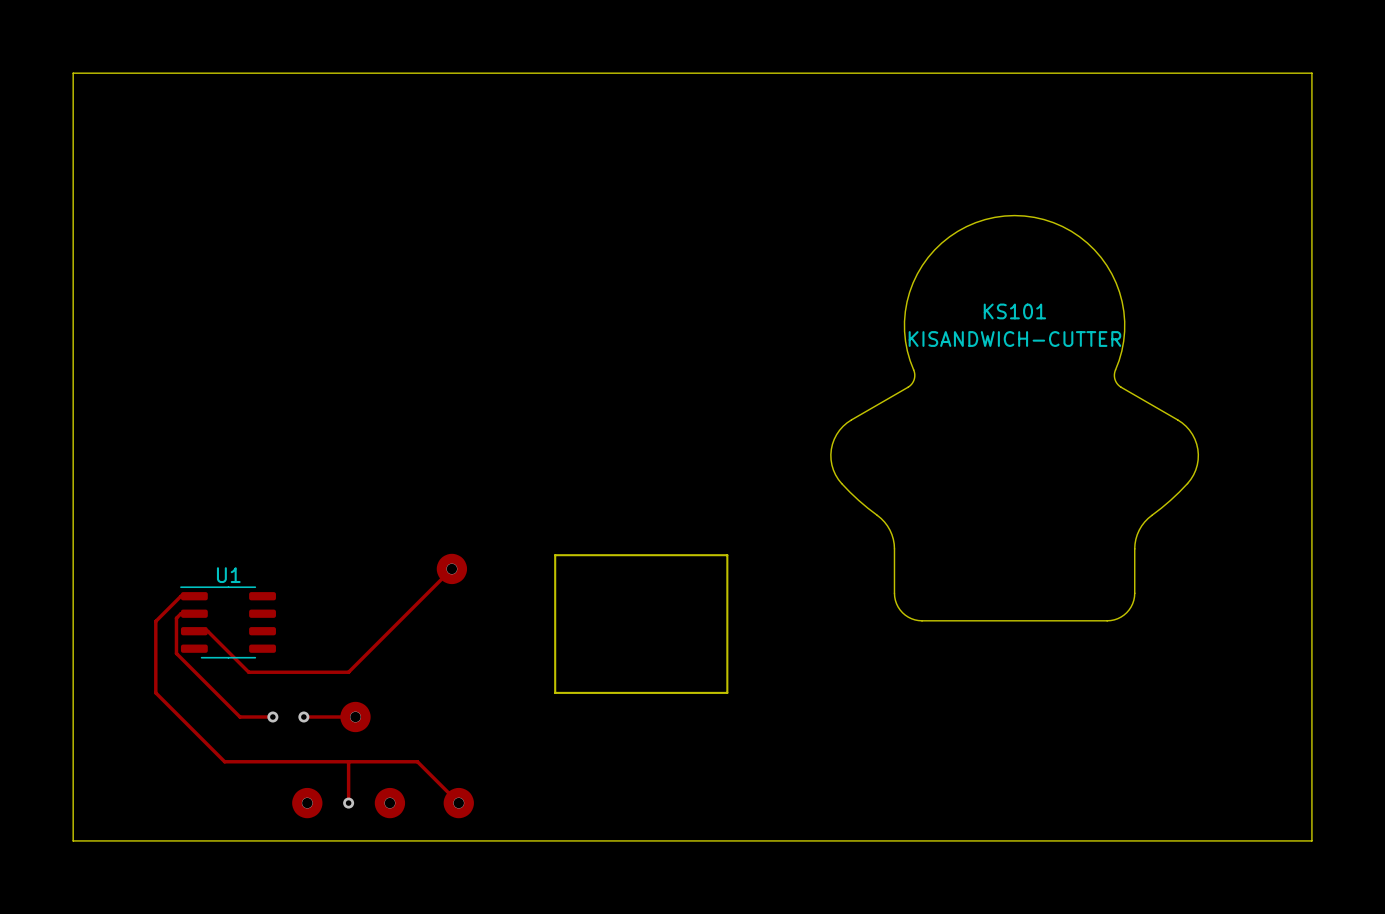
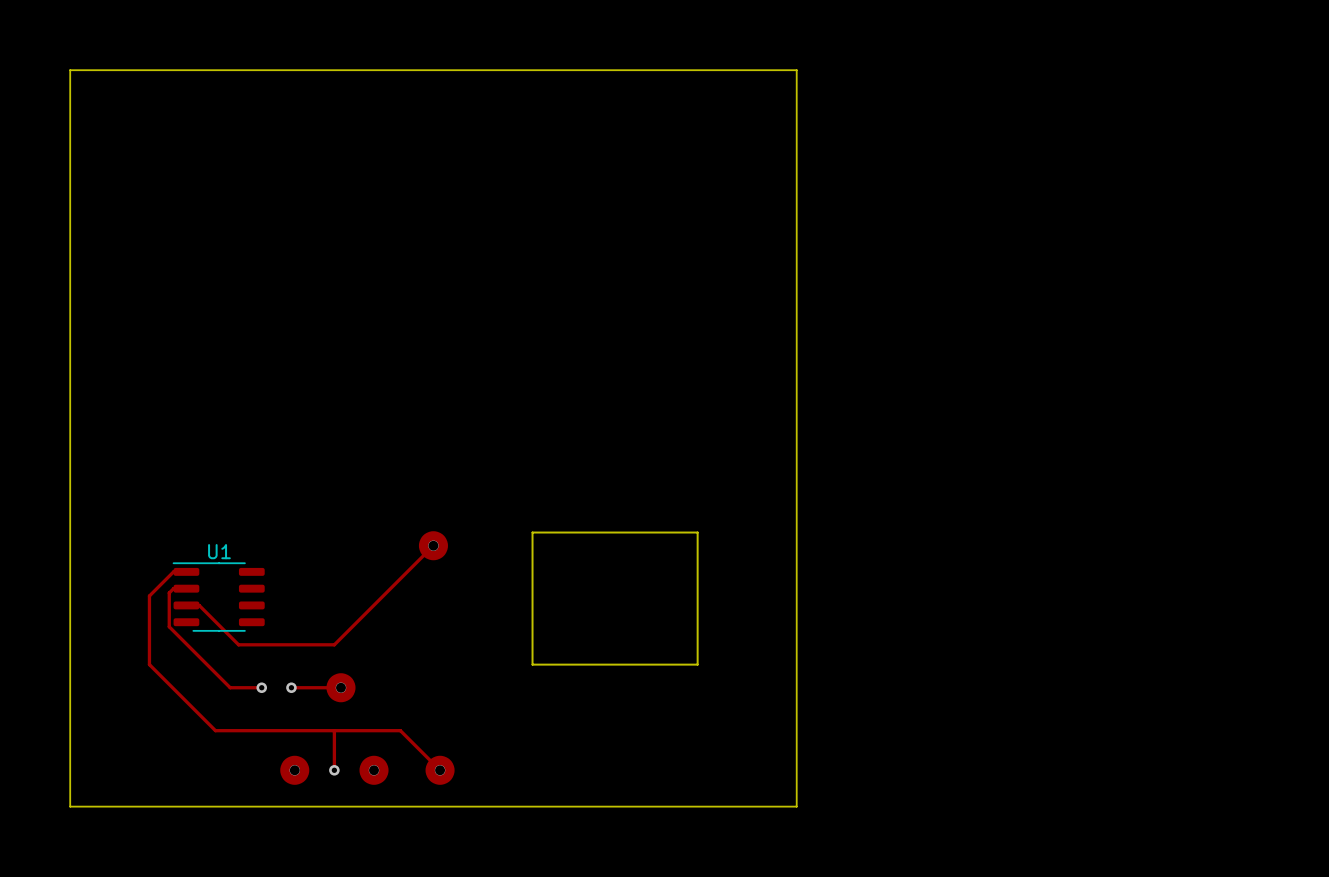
board edge: (830, 73) (1311, 73) (1311, 840) (830, 840) -> (796, 70) (796, 806)
KS101: KISANDWICH-CUTTER (1014, 418) -> none

